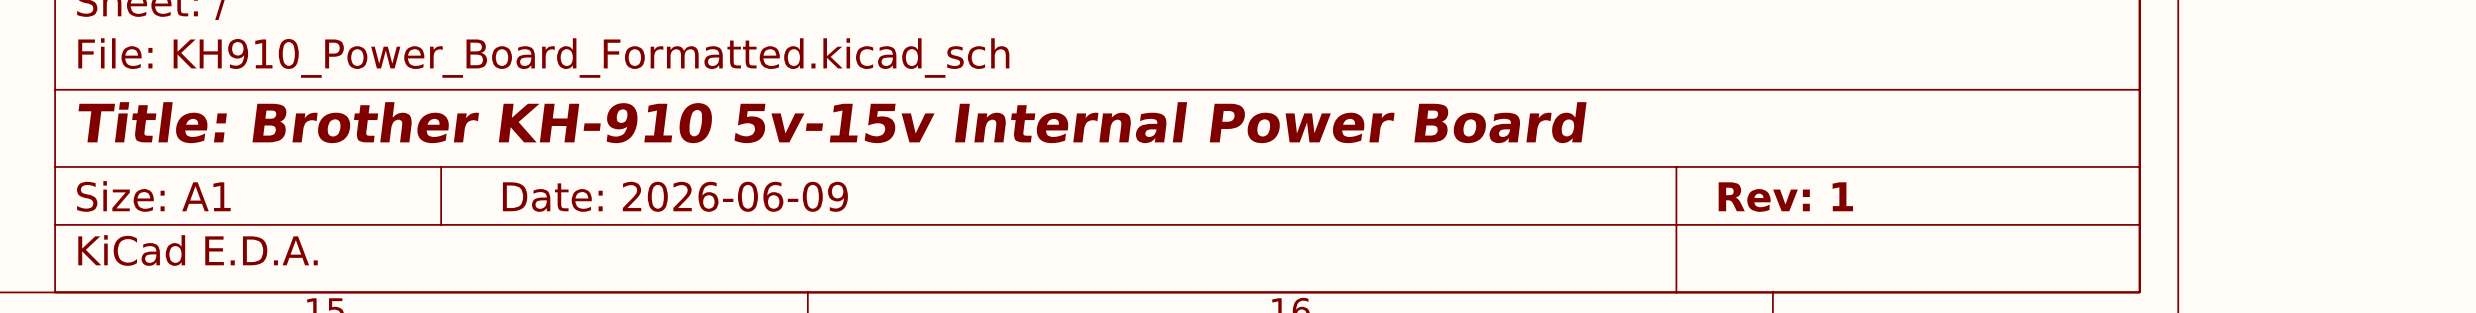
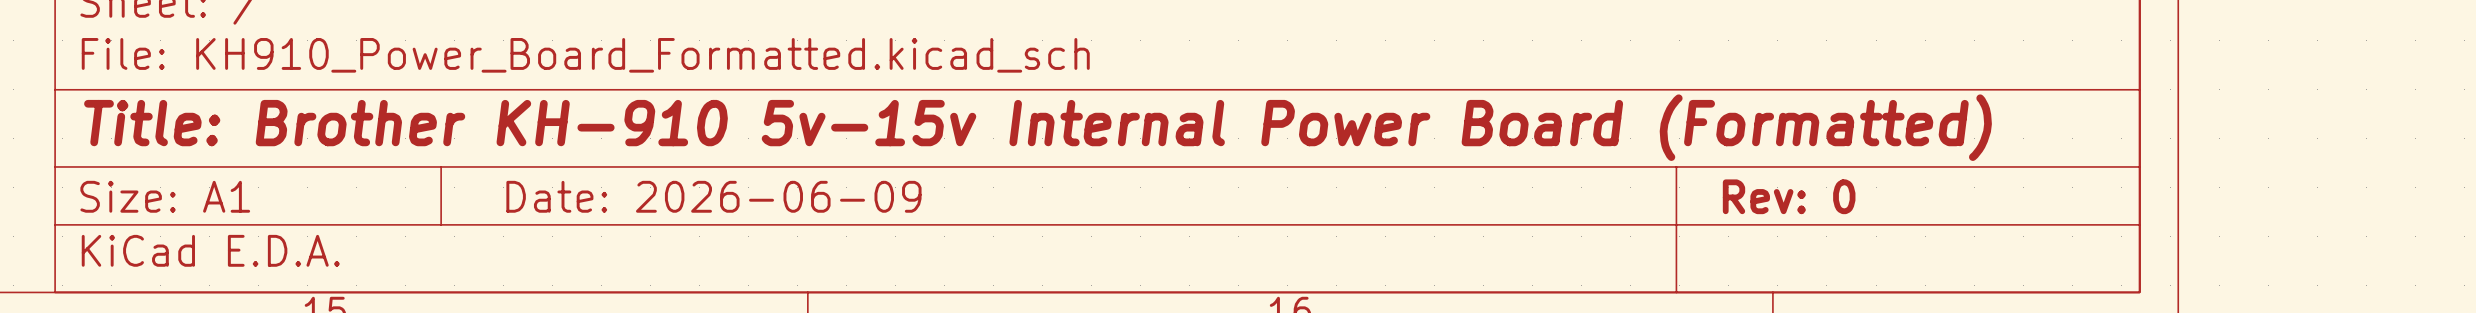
title block: Title: Brother KH-910 5v-15v Internal Power Board (832, 122) -> Title: Brother KH-910 5v-15v Internal Power Board (Formatted) (1038, 127)
title block: Rev: 1 (1785, 197) -> Rev: 0 (1789, 196)

